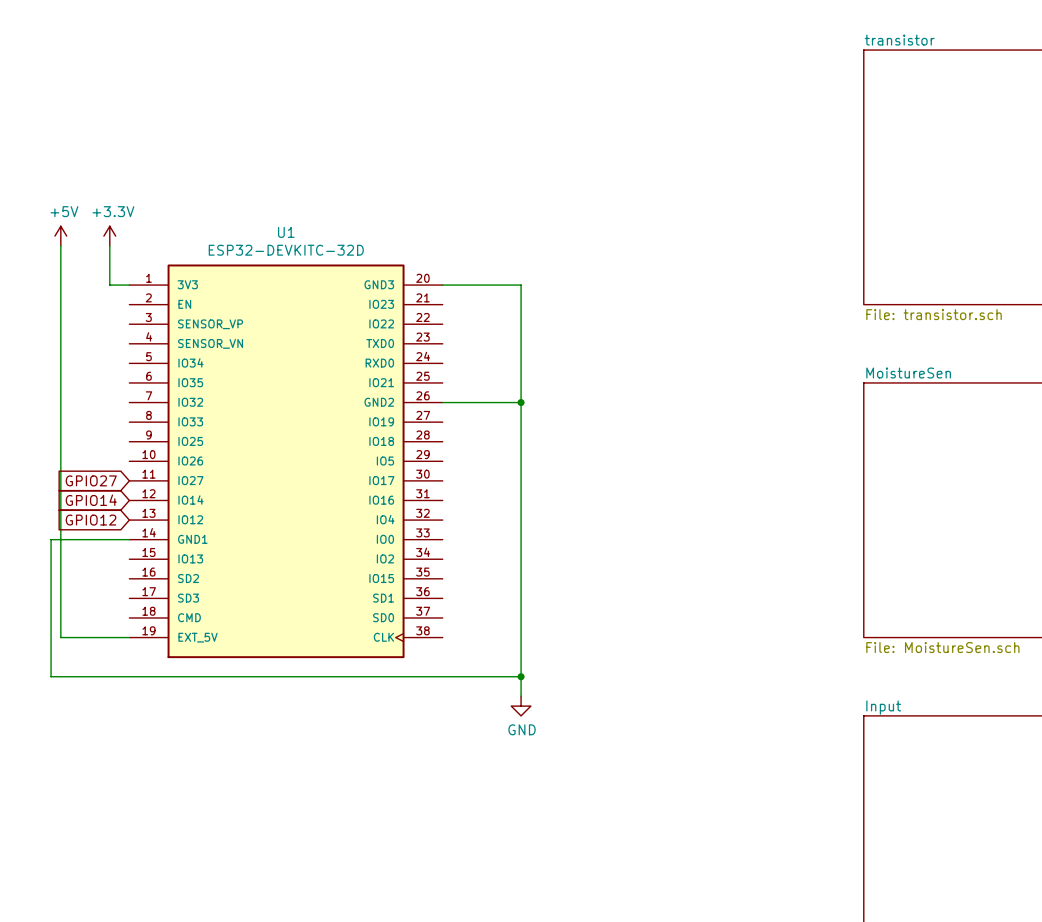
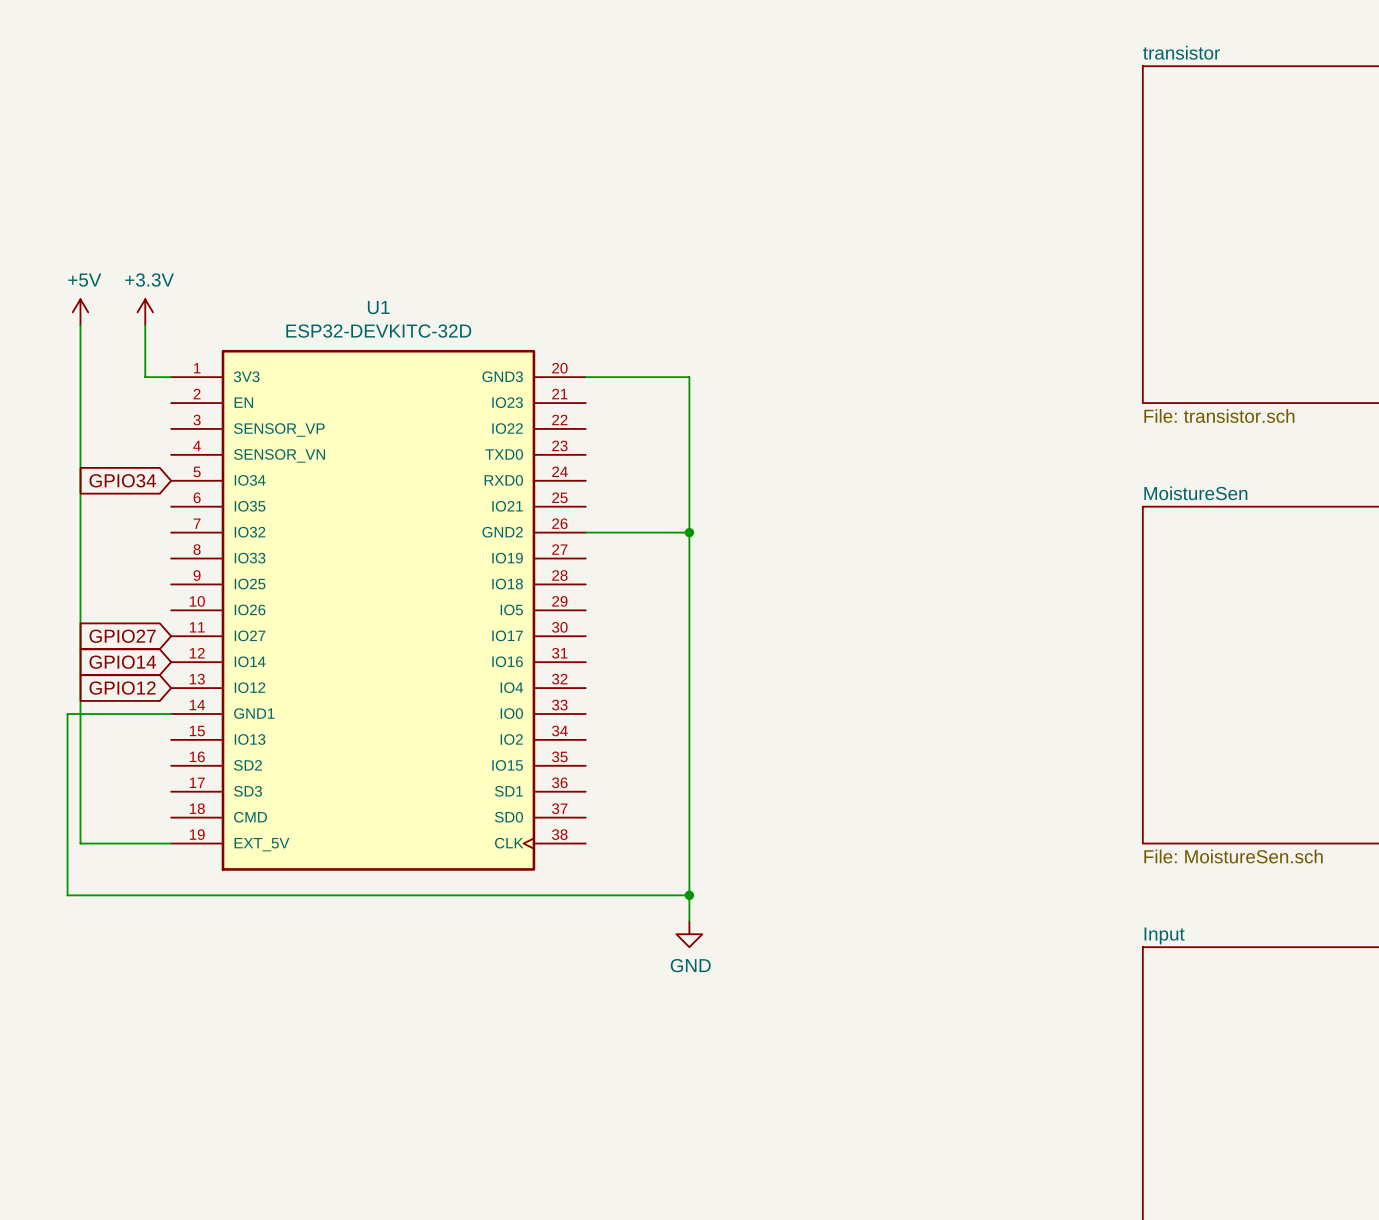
global label: none -> GPIO34 (122, 480)

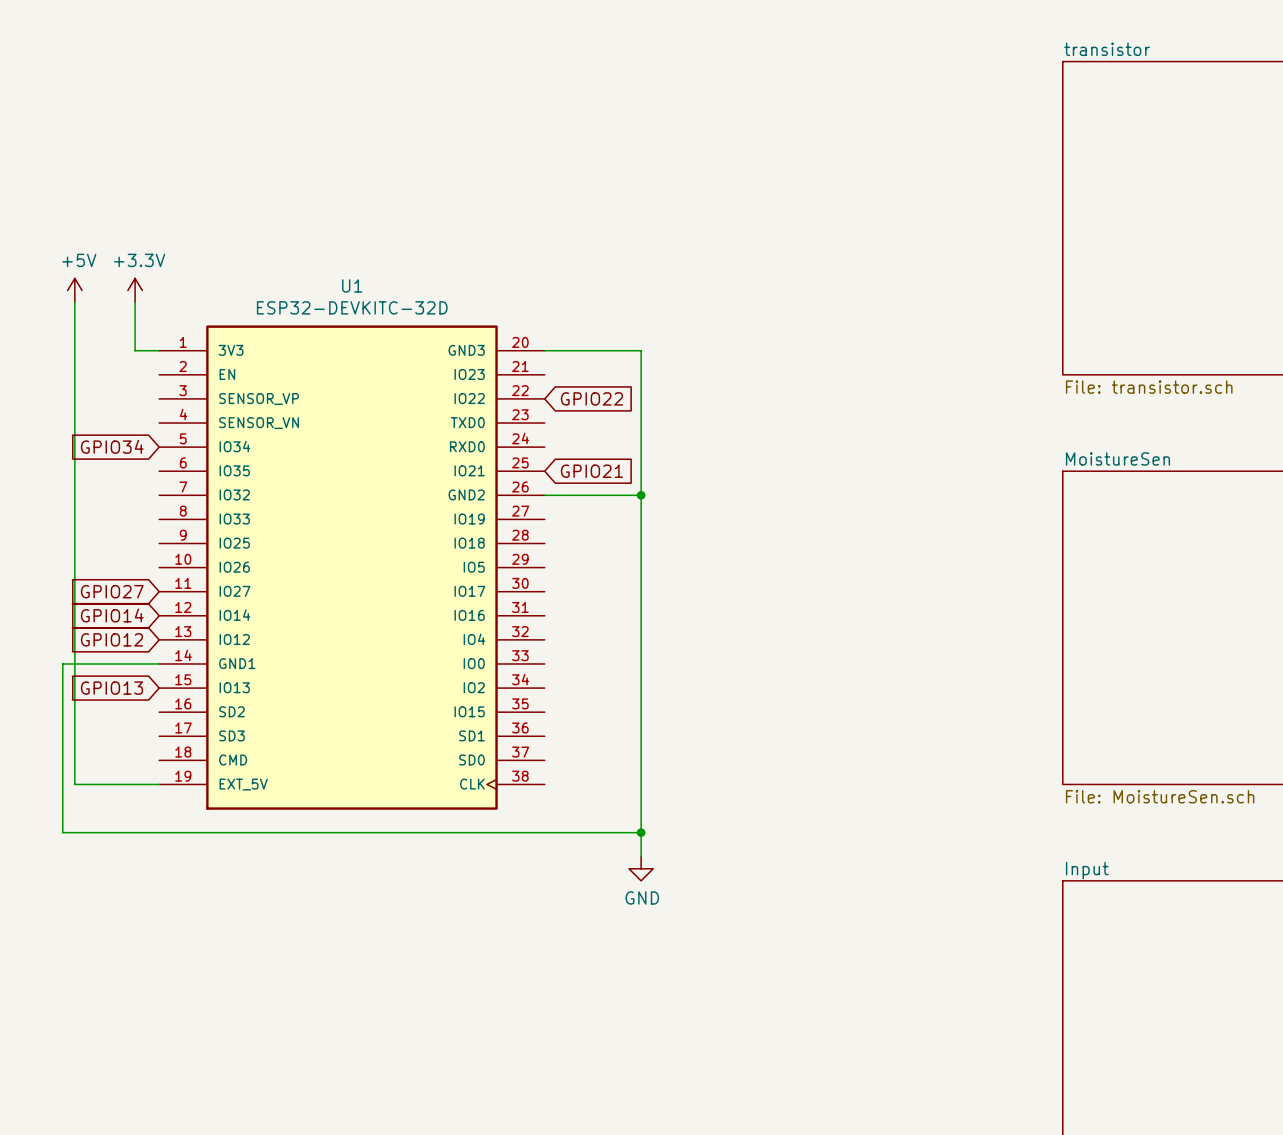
global label: none -> GPIO22 (591, 398)
global label: none -> GPIO21 (591, 471)
global label: none -> GPIO13 (111, 688)

